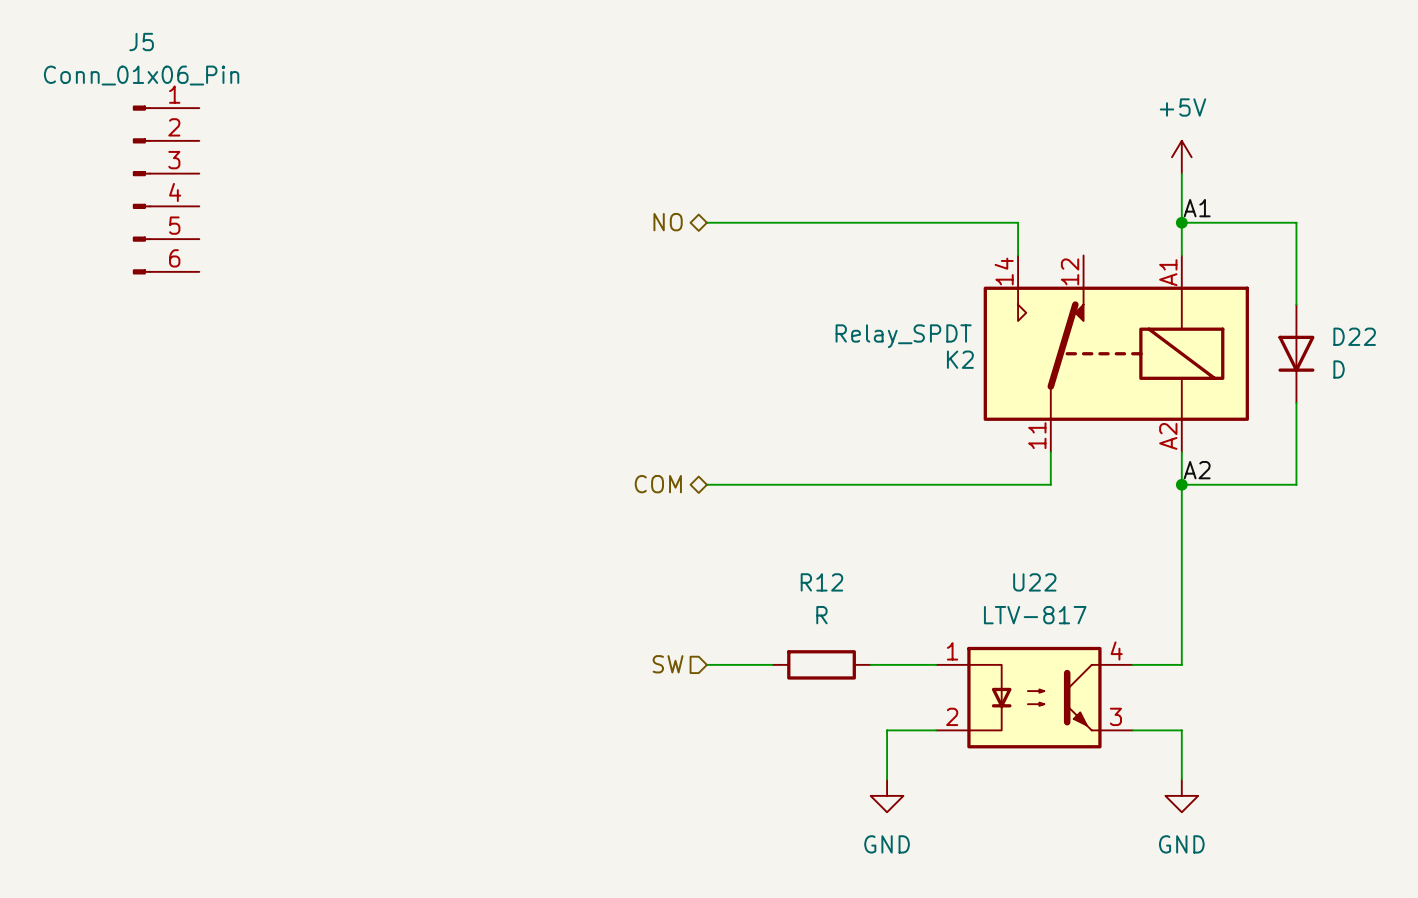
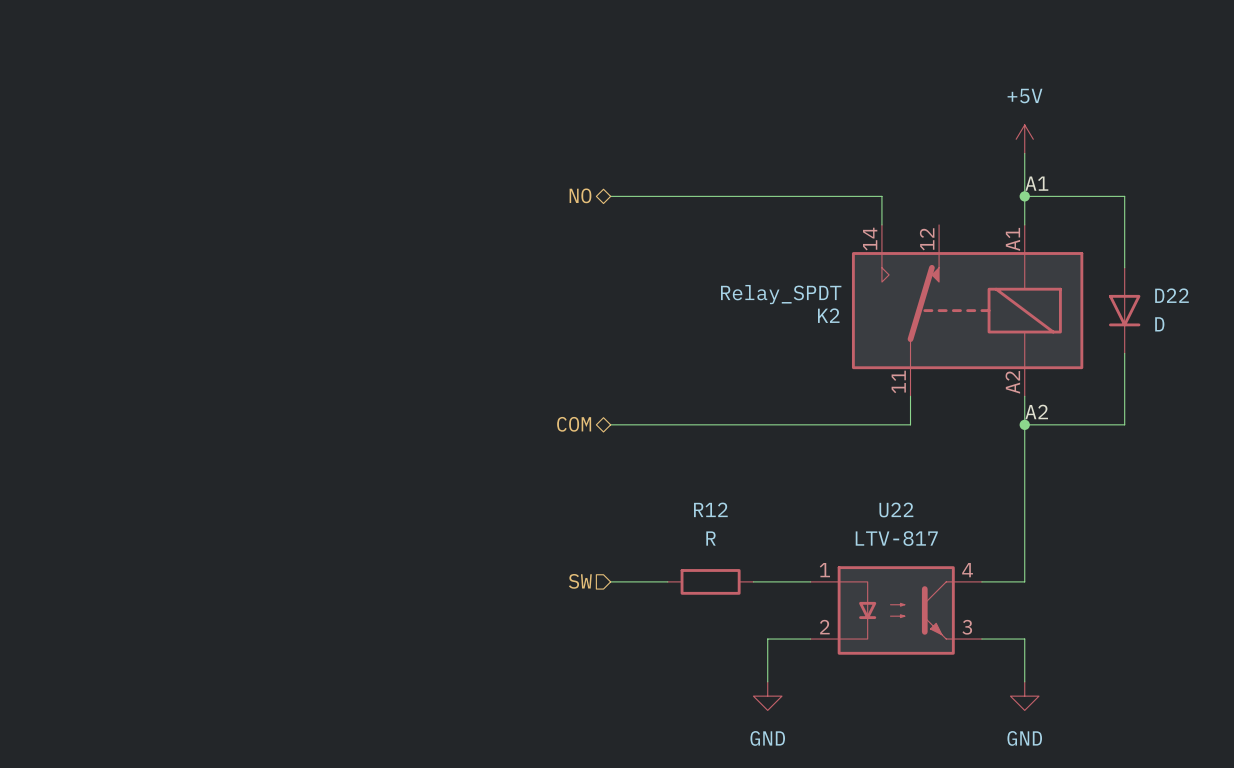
J5: Conn_01x06_Pin (166, 190) -> none

